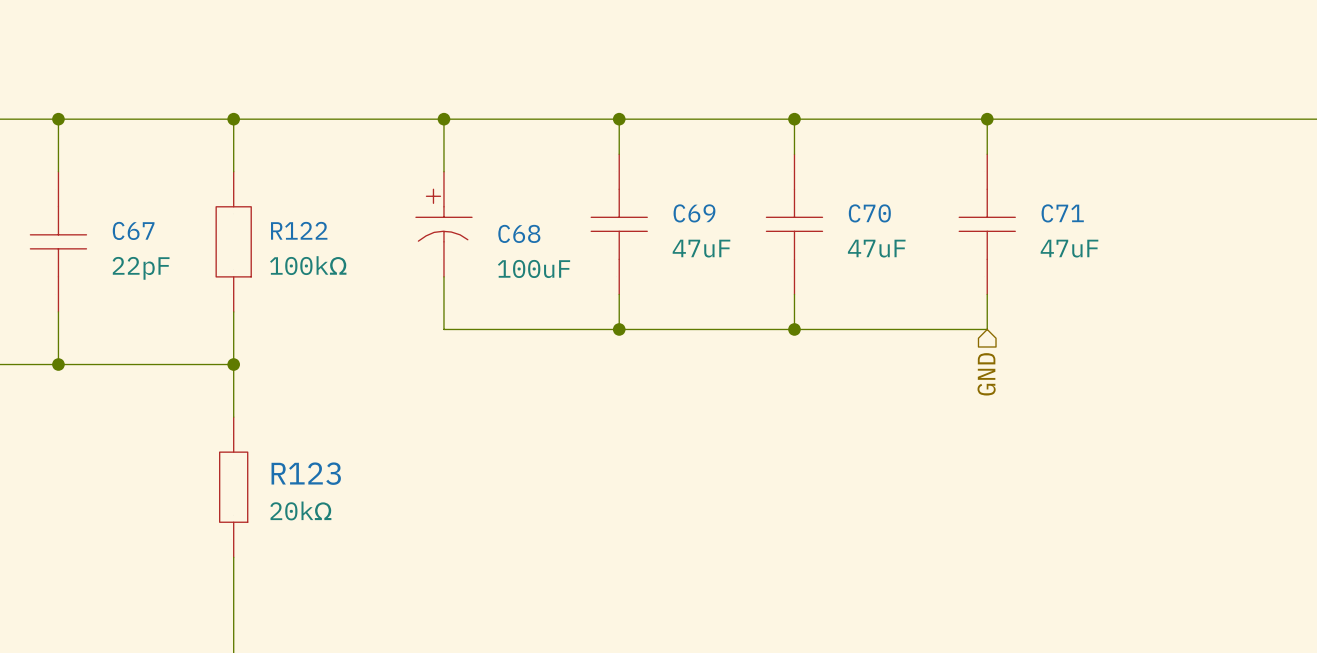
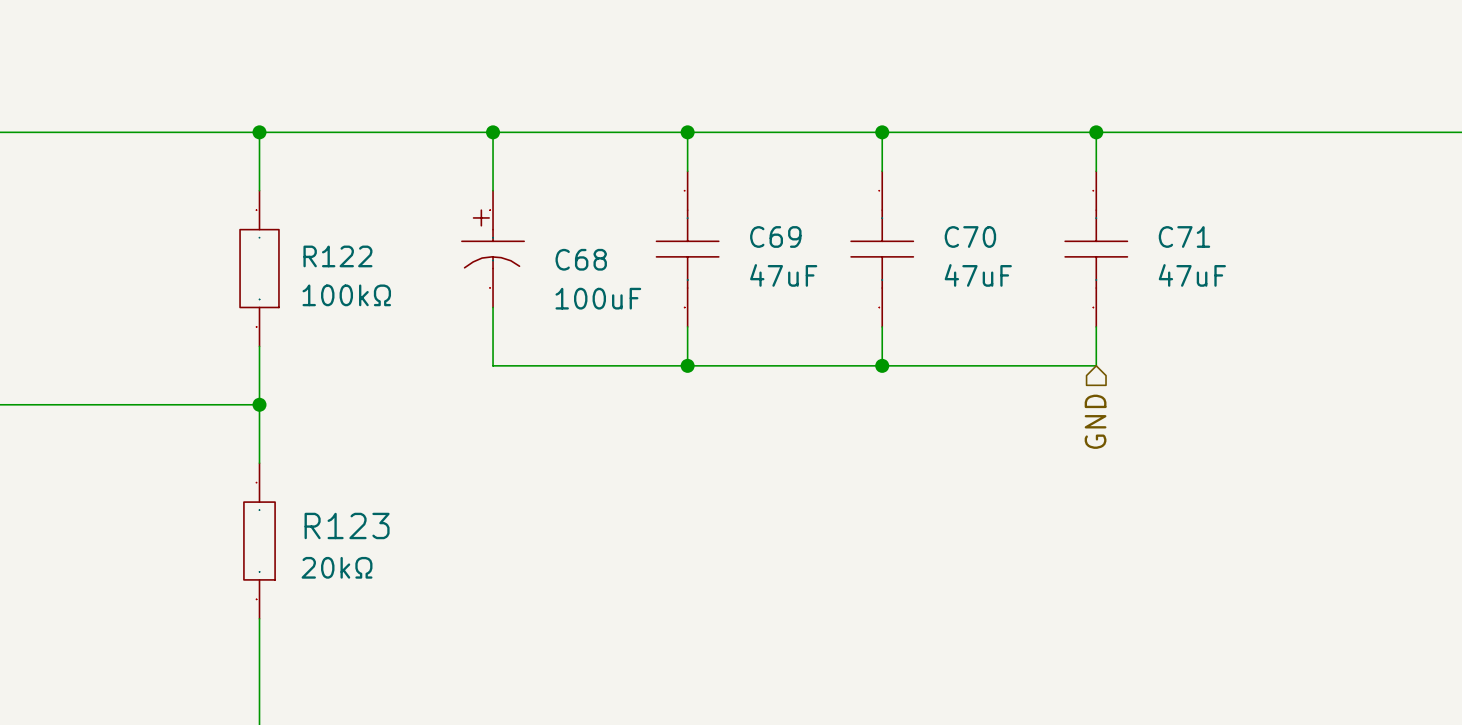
wire: (58, 119) (58, 171) -> none
junction: (58, 119) -> none
C67: 22pF (58, 241) -> none
wire: (58, 311) (58, 364) -> none
junction: (58, 364) -> none

